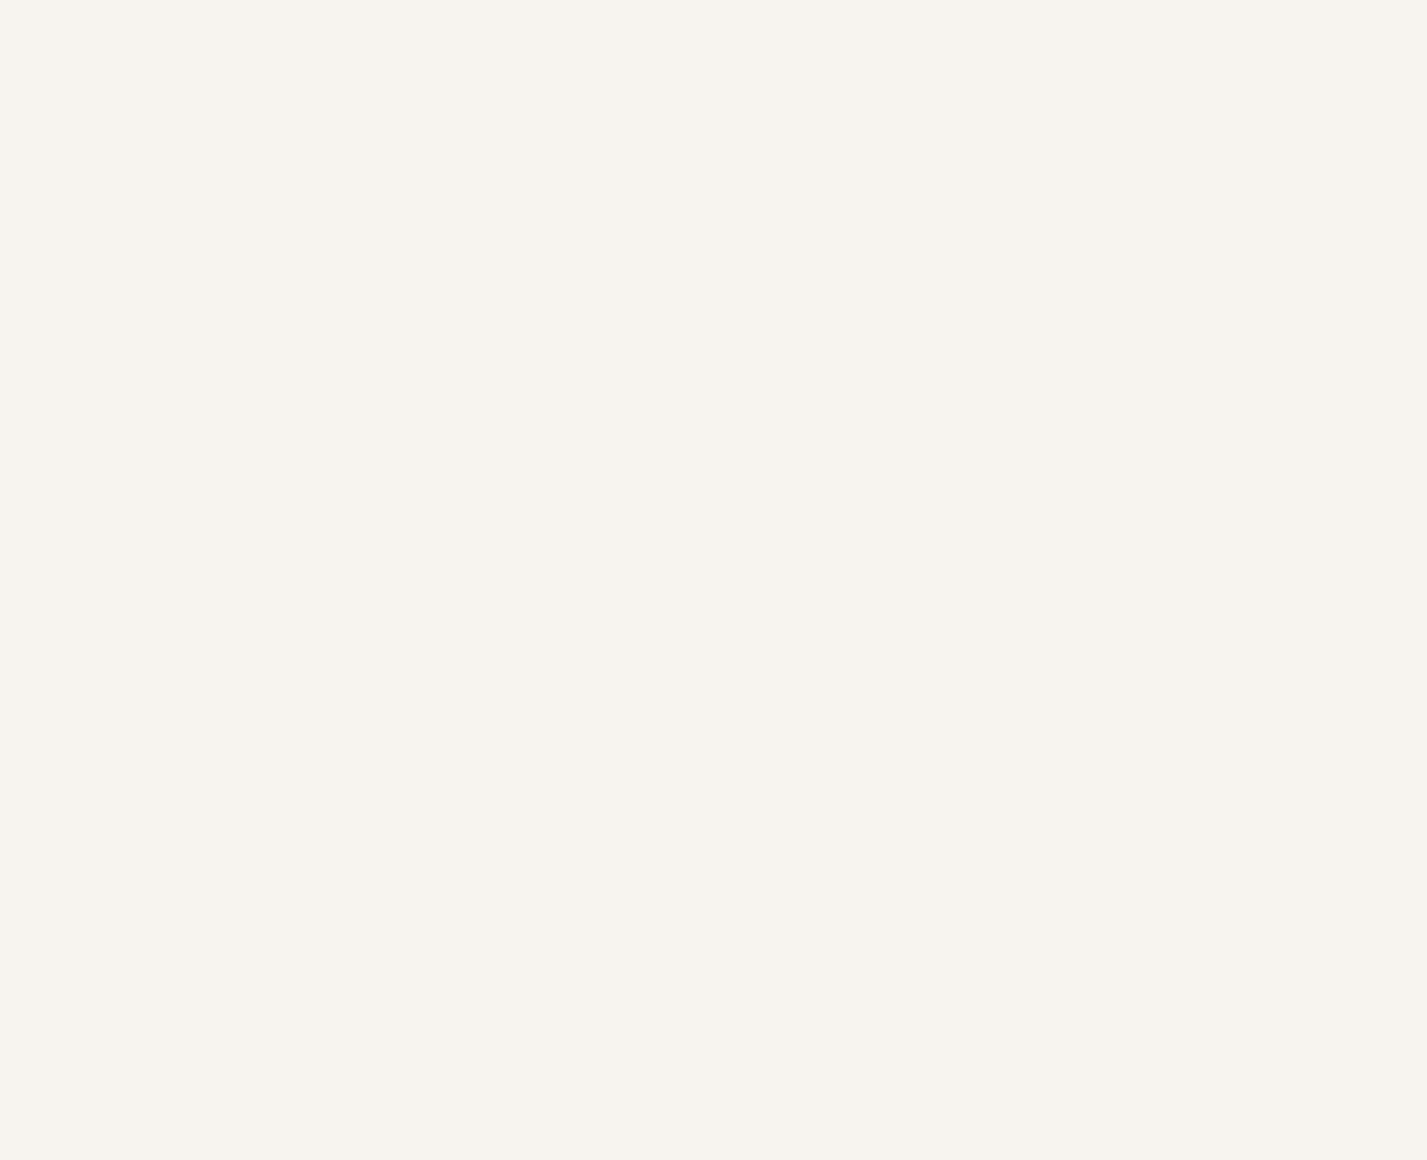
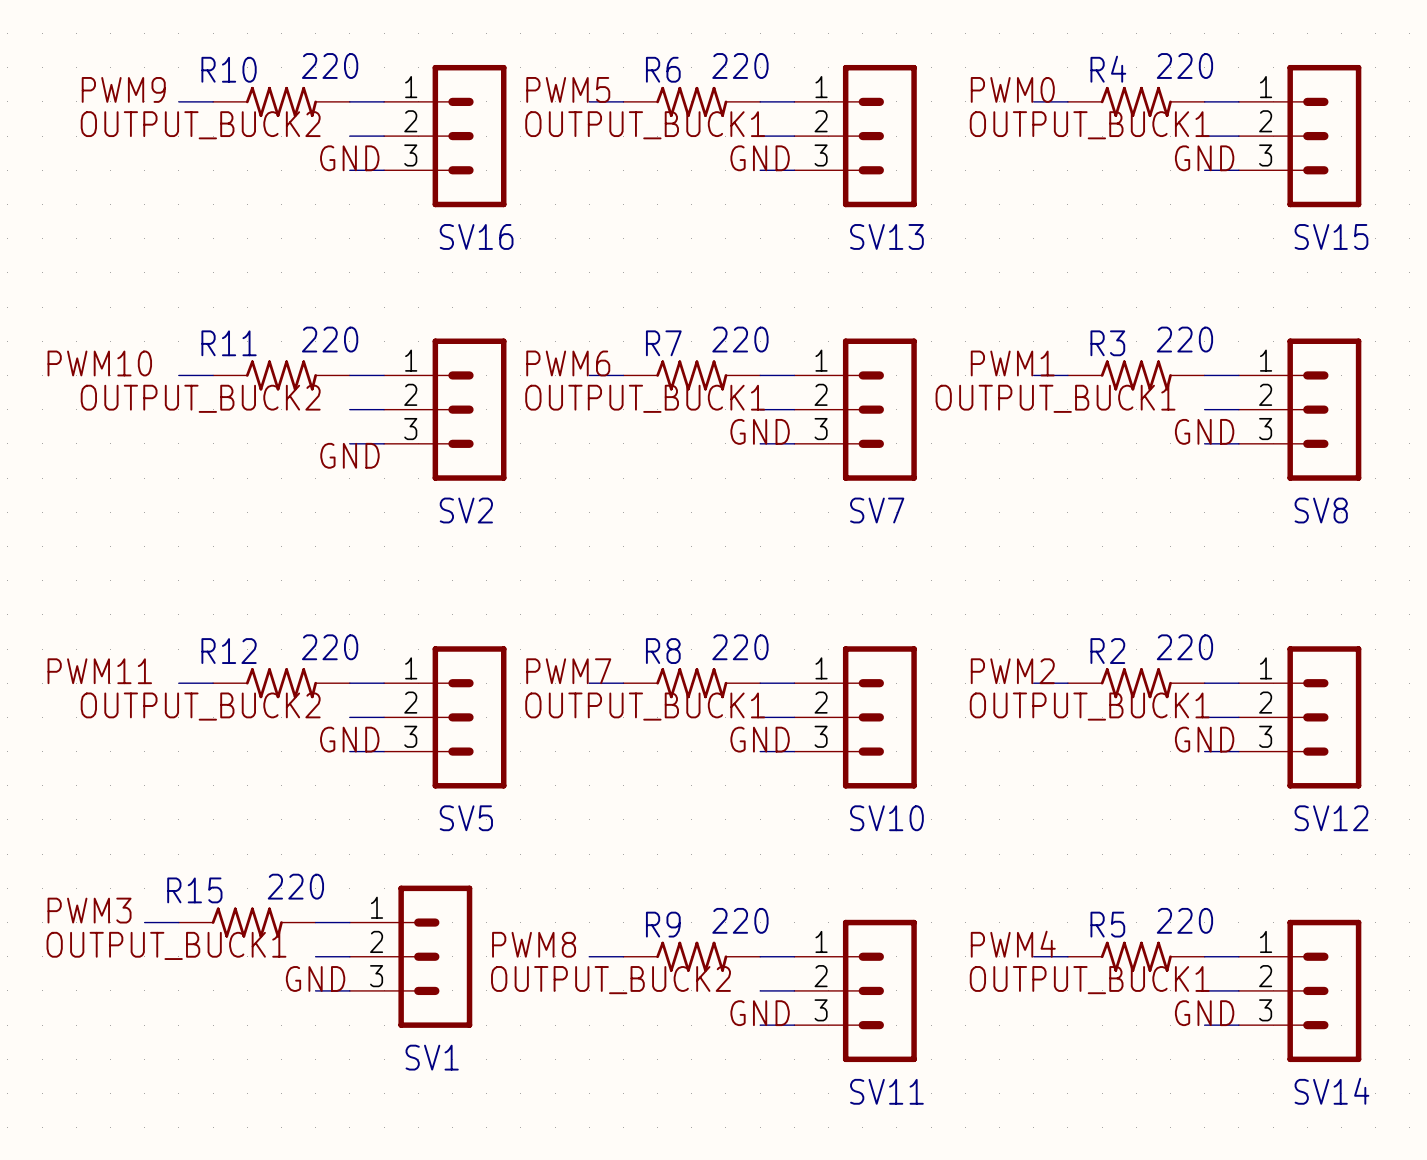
label: none -> PWM9 (123, 89)
label: none -> PWM5 (568, 89)
label: none -> PWM0 (1012, 89)
wire: none -> (178, 101) (213, 101)
R10: none -> 220 (281, 101)
wire: none -> (349, 101) (384, 101)
wire: none -> (589, 101) (623, 101)
R6: none -> 220 (691, 101)
wire: none -> (760, 101) (794, 101)
wire: none -> (1033, 101) (1067, 101)
R4: none -> 220 (1136, 101)
wire: none -> (1204, 101) (1238, 101)
label: none -> OUTPUT_BUCK2 (200, 125)
label: none -> OUTPUT_BUCK1 (645, 125)
label: none -> OUTPUT_BUCK1 (1089, 125)
wire: none -> (349, 136) (384, 136)
SV16: none -> (445, 136)
wire: none -> (760, 136) (794, 136)
SV13: none -> (855, 136)
wire: none -> (1204, 136) (1238, 136)
SV15: none -> (1300, 136)
label: none -> GND (349, 158)
label: none -> GND (760, 158)
label: none -> GND (1204, 158)
wire: none -> (349, 170) (384, 170)
wire: none -> (760, 170) (794, 170)
wire: none -> (1204, 170) (1238, 170)
label: none -> PWM10 (99, 363)
label: none -> PWM6 (568, 363)
label: none -> PWM1 (1012, 363)
wire: none -> (178, 375) (213, 375)
R11: none -> 220 (281, 375)
wire: none -> (349, 375) (384, 375)
wire: none -> (589, 375) (623, 375)
R7: none -> 220 (691, 375)
wire: none -> (760, 375) (794, 375)
wire: none -> (1033, 375) (1067, 375)
R3: none -> 220 (1136, 375)
wire: none -> (1204, 375) (1238, 375)
label: none -> OUTPUT_BUCK2 (200, 398)
label: none -> OUTPUT_BUCK1 (645, 398)
label: none -> OUTPUT_BUCK1 (1055, 398)
wire: none -> (349, 409) (384, 409)
SV2: none -> (445, 409)
wire: none -> (760, 409) (794, 409)
SV7: none -> (855, 409)
wire: none -> (1204, 409) (1238, 409)
SV8: none -> (1300, 409)
label: none -> GND (760, 431)
label: none -> GND (1204, 431)
wire: none -> (349, 443) (384, 443)
wire: none -> (760, 443) (794, 443)
wire: none -> (1204, 443) (1238, 443)
label: none -> GND (349, 455)
label: none -> PWM11 (99, 671)
label: none -> PWM7 (568, 671)
label: none -> PWM2 (1012, 671)
wire: none -> (178, 683) (213, 683)
R12: none -> 220 (281, 683)
wire: none -> (349, 683) (384, 683)
wire: none -> (589, 683) (623, 683)
R8: none -> 220 (691, 683)
wire: none -> (760, 683) (794, 683)
wire: none -> (1033, 683) (1067, 683)
R2: none -> 220 (1136, 683)
wire: none -> (1204, 683) (1238, 683)
label: none -> OUTPUT_BUCK2 (200, 706)
label: none -> OUTPUT_BUCK1 (645, 706)
label: none -> OUTPUT_BUCK1 (1089, 706)
wire: none -> (349, 717) (384, 717)
SV5: none -> (445, 717)
wire: none -> (760, 717) (794, 717)
SV10: none -> (855, 717)
wire: none -> (1204, 717) (1238, 717)
SV12: none -> (1300, 717)
label: none -> GND (349, 739)
label: none -> GND (760, 739)
label: none -> GND (1204, 739)
wire: none -> (349, 751) (384, 751)
wire: none -> (760, 751) (794, 751)
wire: none -> (1204, 751) (1238, 751)
label: none -> PWM3 (89, 910)
wire: none -> (144, 922) (178, 922)
R15: none -> 220 (247, 922)
wire: none -> (315, 922) (349, 922)
label: none -> PWM8 (534, 944)
label: none -> PWM4 (1013, 944)
label: none -> OUTPUT_BUCK1 (166, 945)
wire: none -> (315, 956) (349, 956)
SV1: none -> (411, 956)
wire: none -> (589, 956) (623, 956)
R9: none -> 220 (691, 956)
wire: none -> (760, 956) (794, 956)
wire: none -> (1033, 956) (1067, 956)
R5: none -> 220 (1136, 956)
wire: none -> (1204, 956) (1238, 956)
label: none -> GND (315, 978)
label: none -> OUTPUT_BUCK2 (610, 980)
label: none -> OUTPUT_BUCK1 (1089, 980)
wire: none -> (315, 990) (349, 990)
wire: none -> (760, 990) (794, 990)
SV11: none -> (855, 990)
wire: none -> (1204, 990) (1238, 990)
SV14: none -> (1300, 990)
label: none -> GND (760, 1013)
label: none -> GND (1204, 1013)
wire: none -> (760, 1025) (794, 1025)
wire: none -> (1204, 1025) (1238, 1025)

